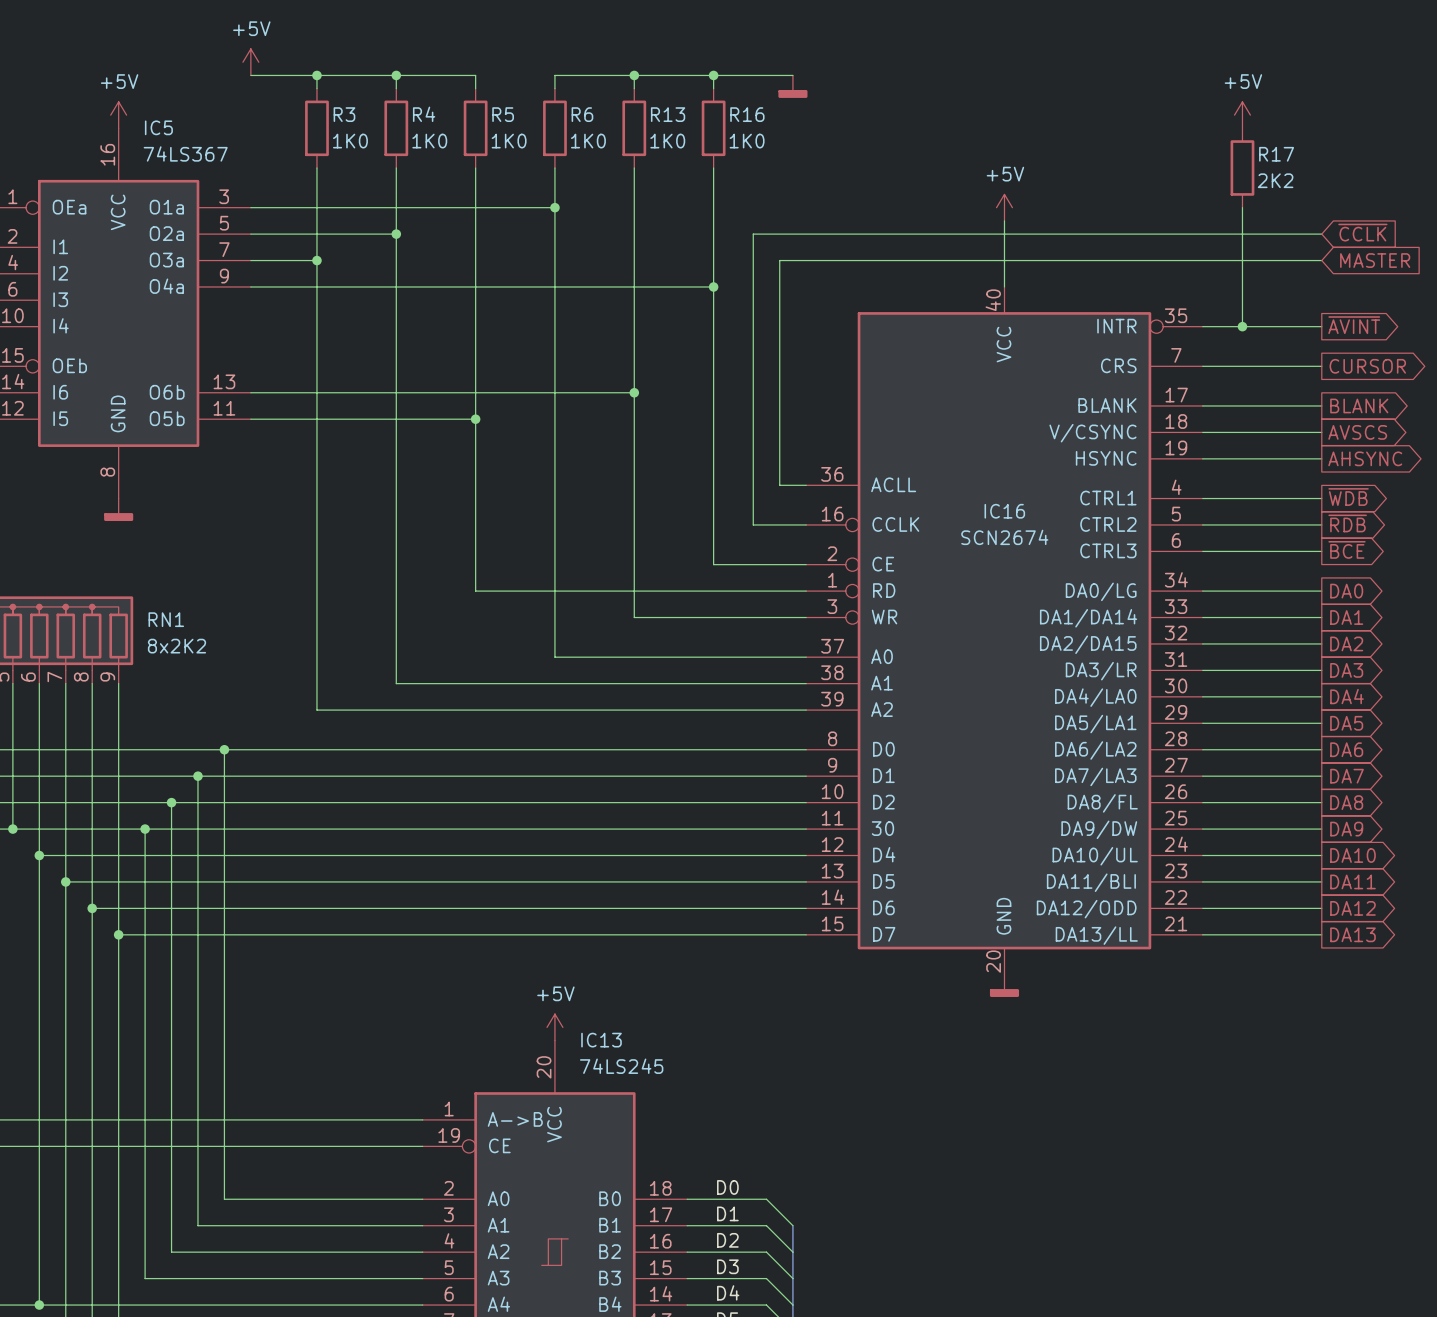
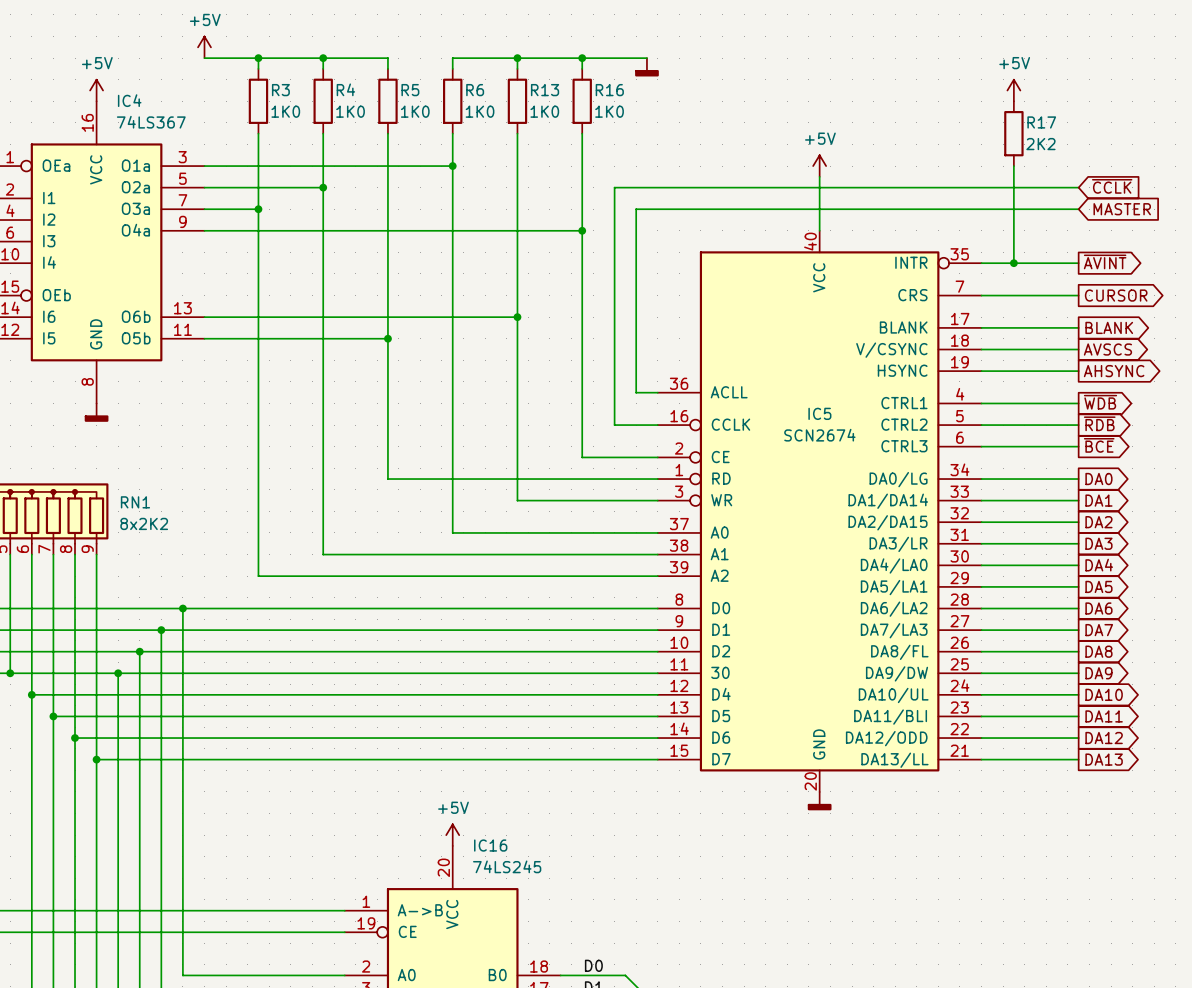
IC5 name: IC5 (158, 127) -> IC4 (129, 100)
IC16 name: IC16 (1004, 511) -> IC5 (819, 413)
IC13 name: IC13 (601, 1040) -> IC16 (490, 845)

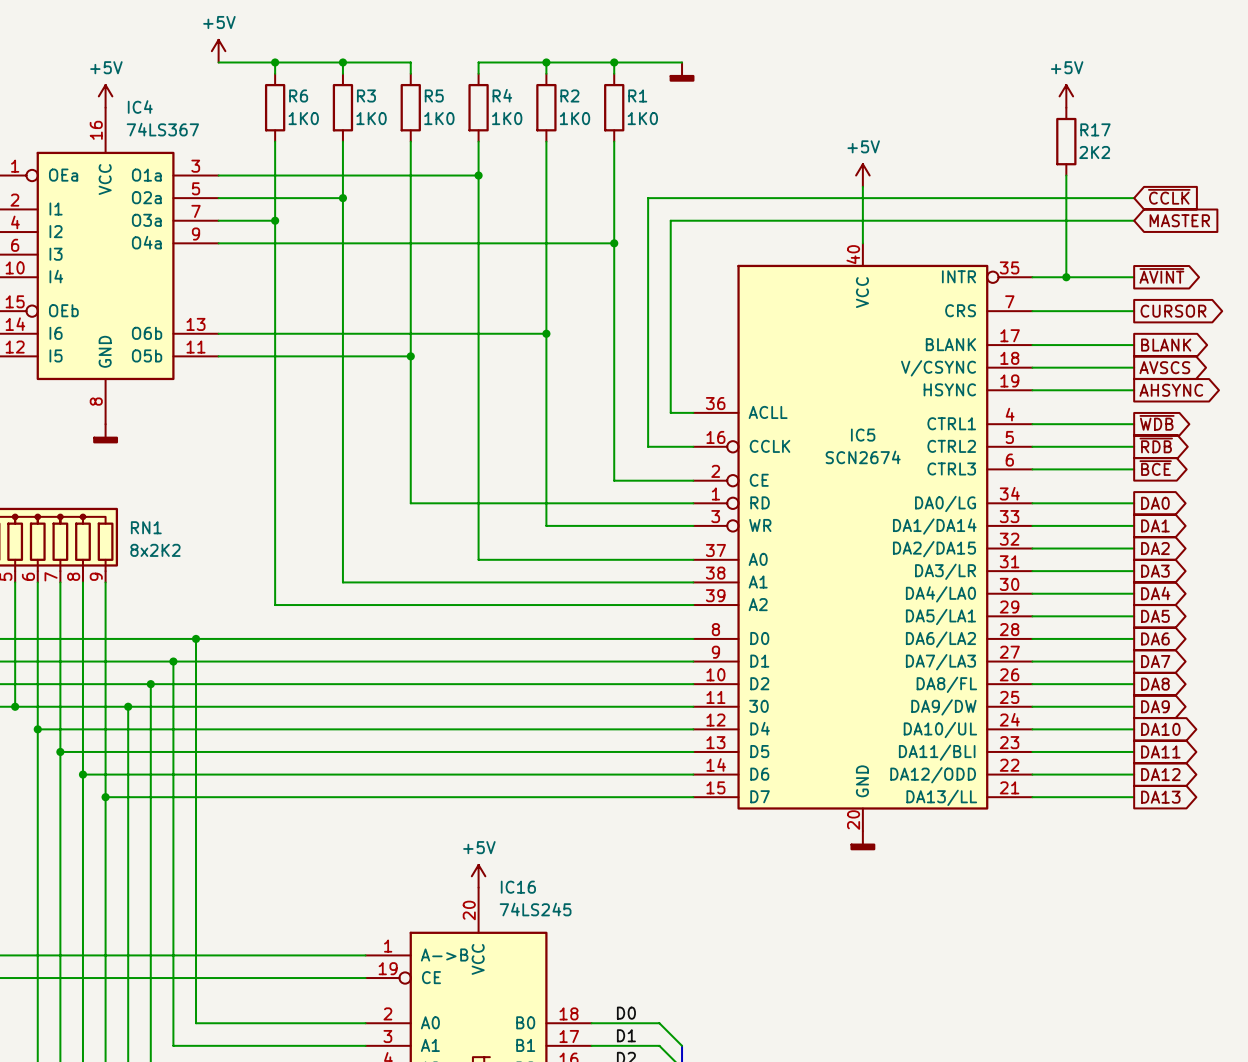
R4 name: R4 (345, 89) -> R3 (366, 95)
R3 name: R3 (280, 90) -> R6 (298, 95)
R6 name: R6 (475, 90) -> R4 (502, 95)
R13 name: R13 (545, 90) -> R2 (569, 95)
R16 name: R16 (609, 90) -> R1 (637, 95)

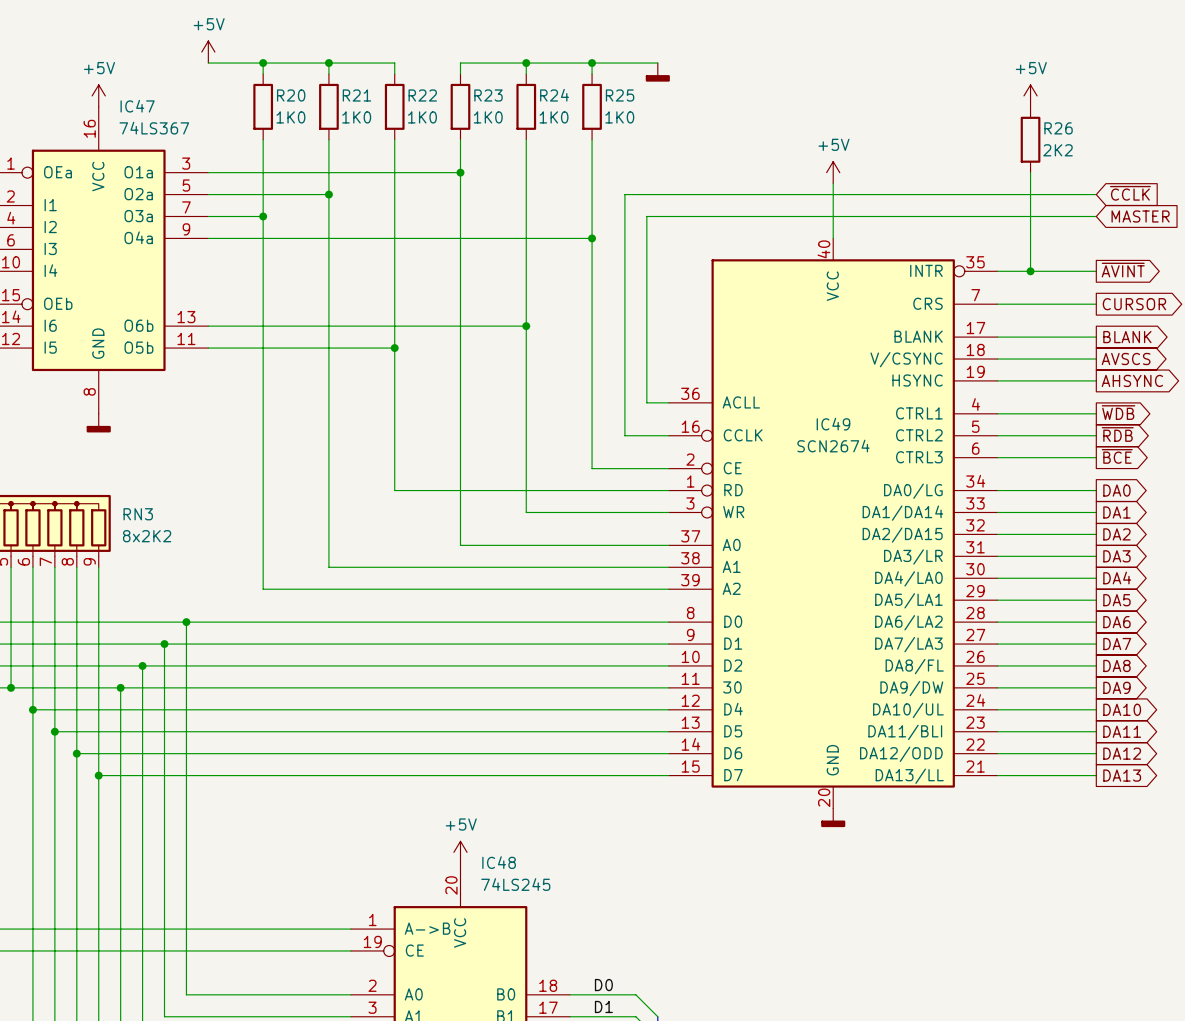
R6 name: R6 (298, 95) -> R20 (291, 95)
R3 name: R3 (366, 95) -> R21 (356, 95)
R5 name: R5 (434, 95) -> R22 (422, 95)
R4 name: R4 (502, 95) -> R23 (488, 95)
R2 name: R2 (569, 95) -> R24 (554, 95)
R1 name: R1 (637, 95) -> R25 (620, 95)
IC4 name: IC4 (140, 107) -> IC47 (137, 106)
R17 name: R17 (1095, 129) -> R26 (1058, 128)
IC5 name: IC5 (863, 435) -> IC49 (833, 424)
RN1 name: RN1 (146, 527) -> RN3 (138, 514)
IC16 name: IC16 (518, 887) -> IC48 (499, 862)

